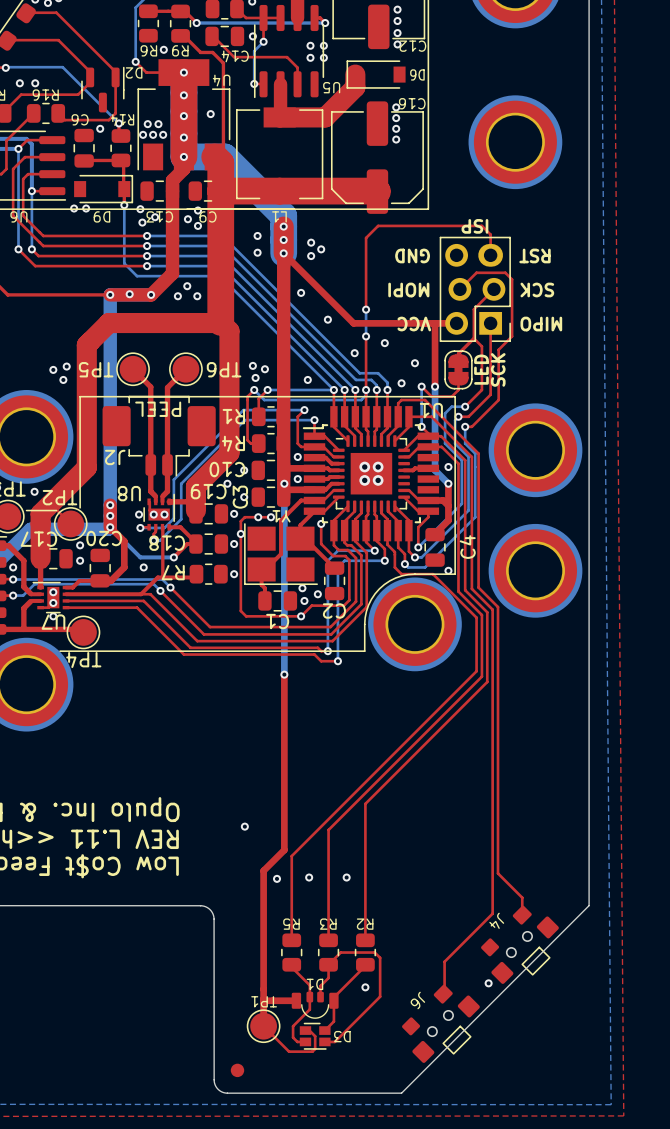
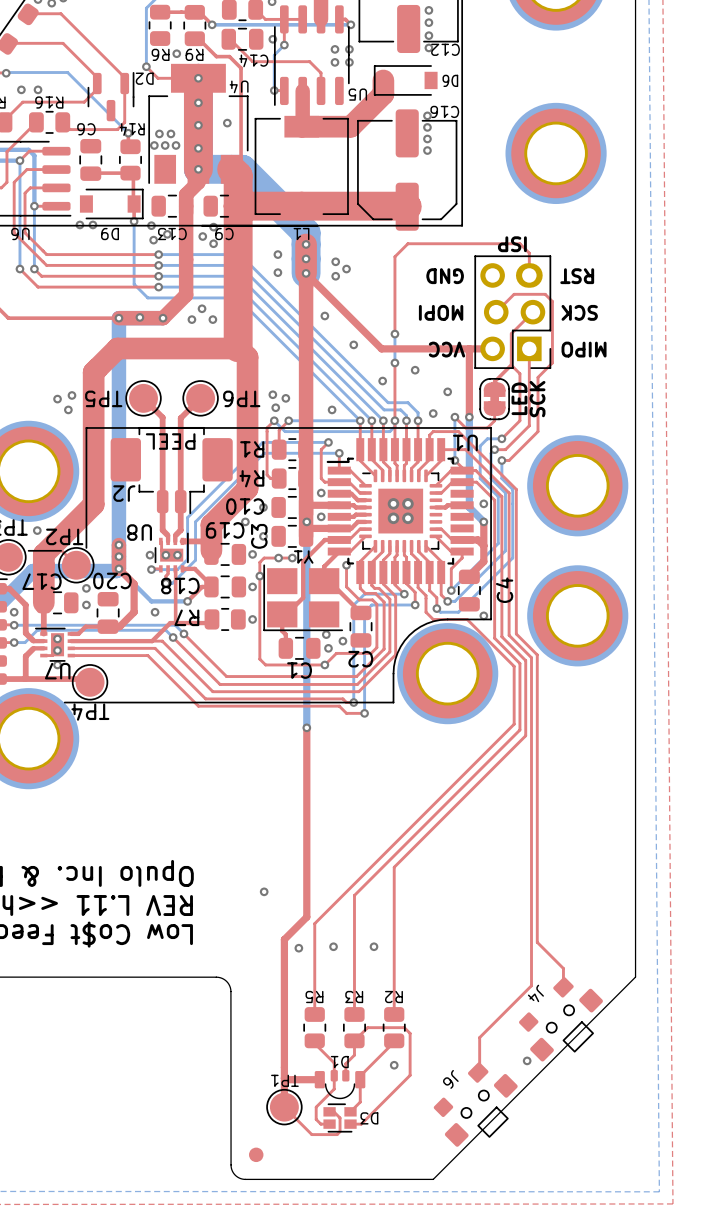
via: (100, 128) -> none

